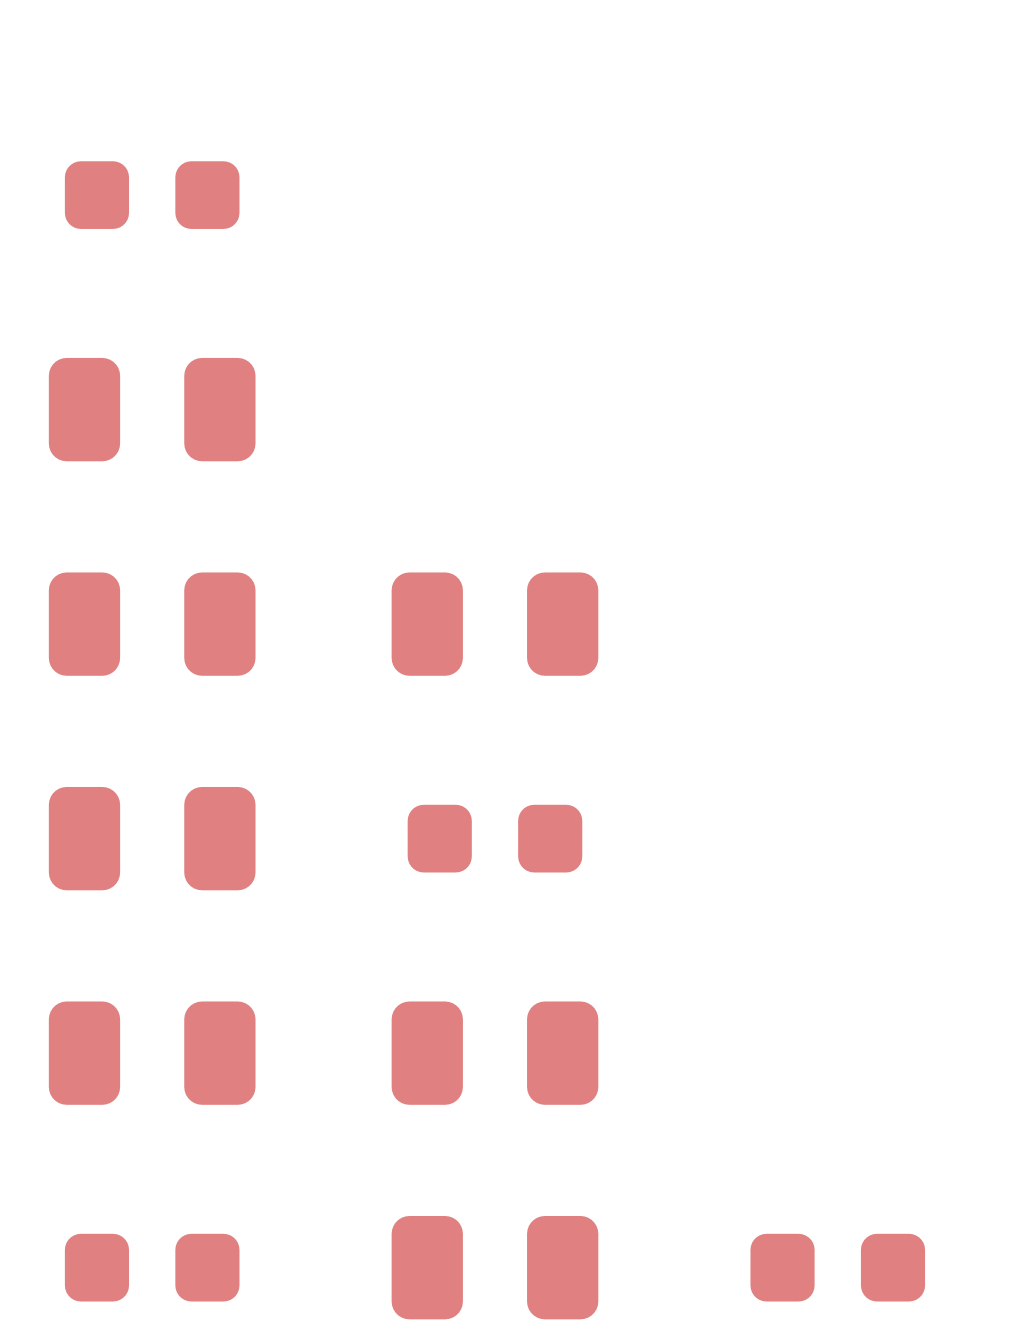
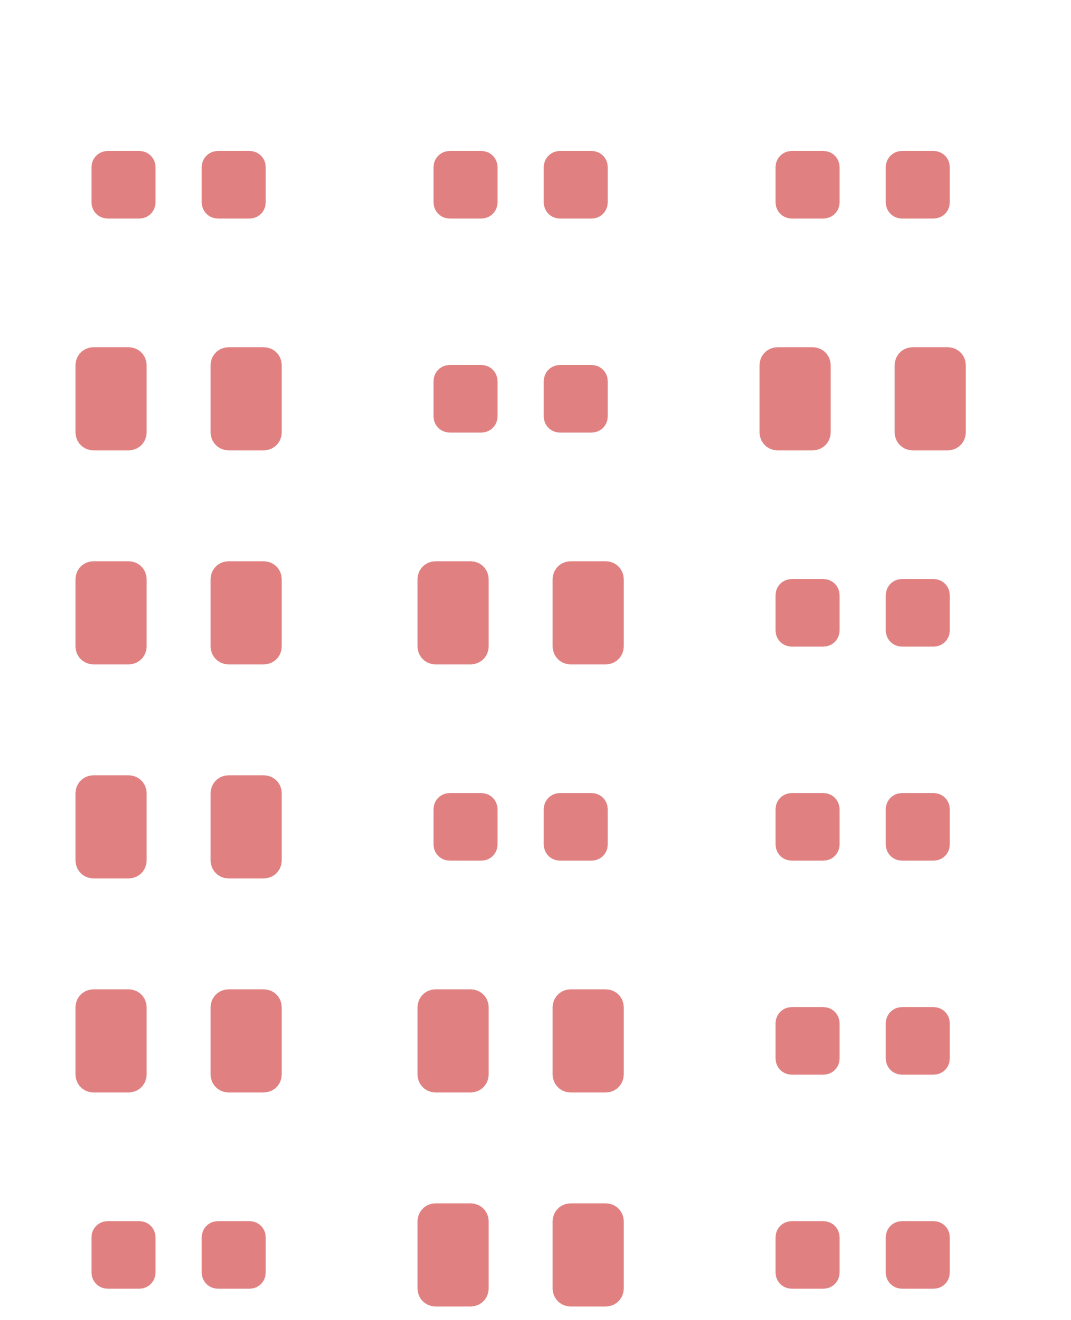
part: none -> (520, 184)
part: none -> (862, 184)
part: none -> (520, 398)
part: none -> (862, 398)
part: none -> (862, 612)
part: none -> (862, 826)
part: none -> (862, 1040)

